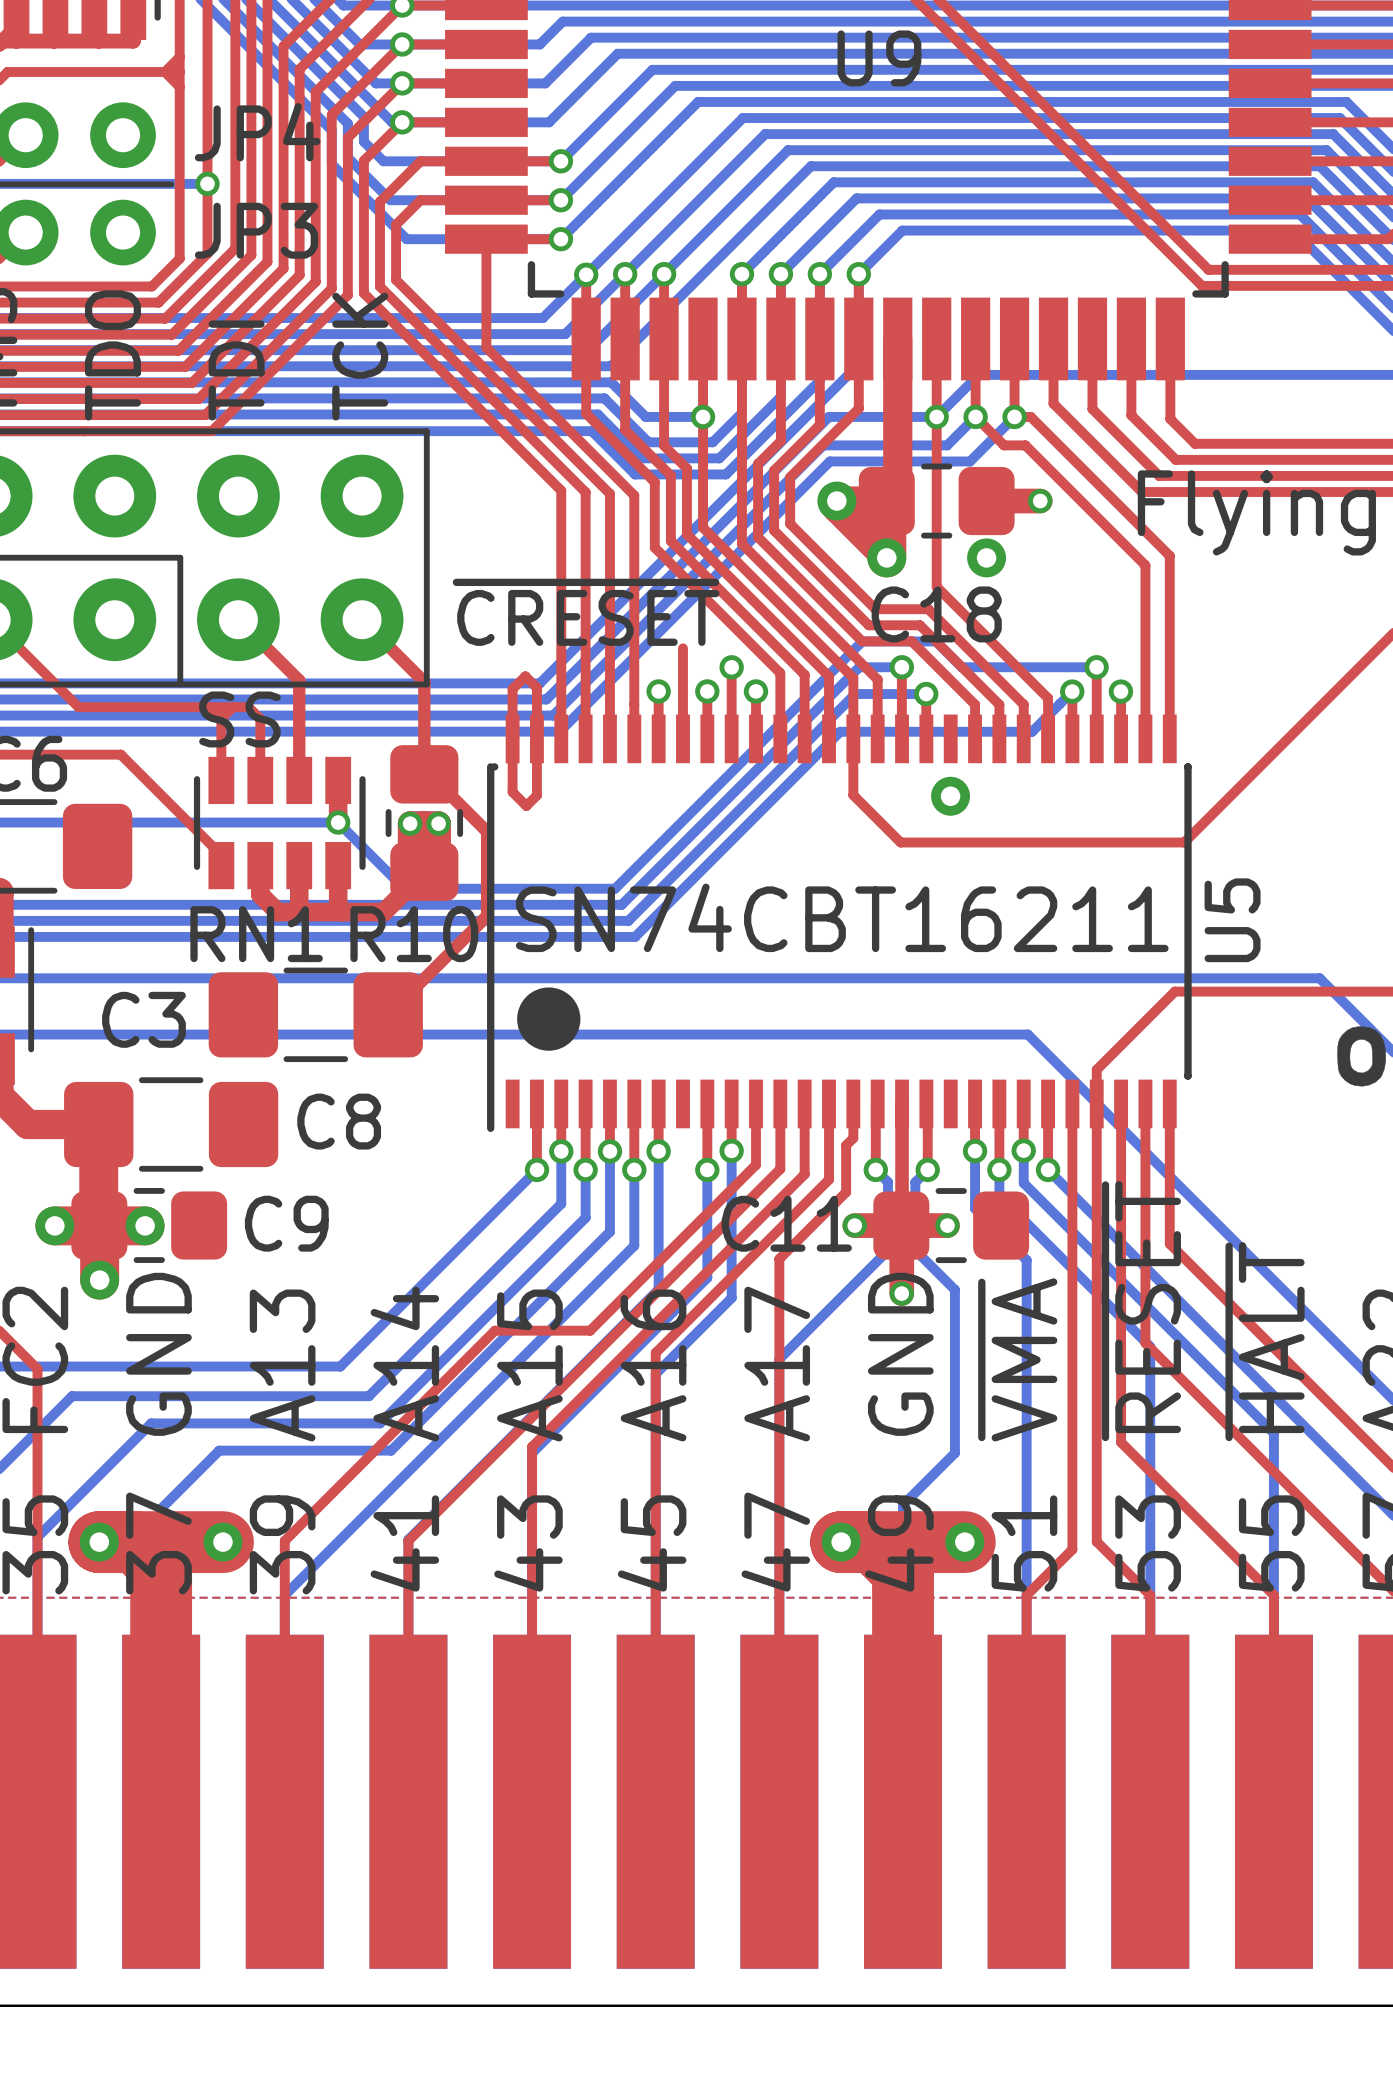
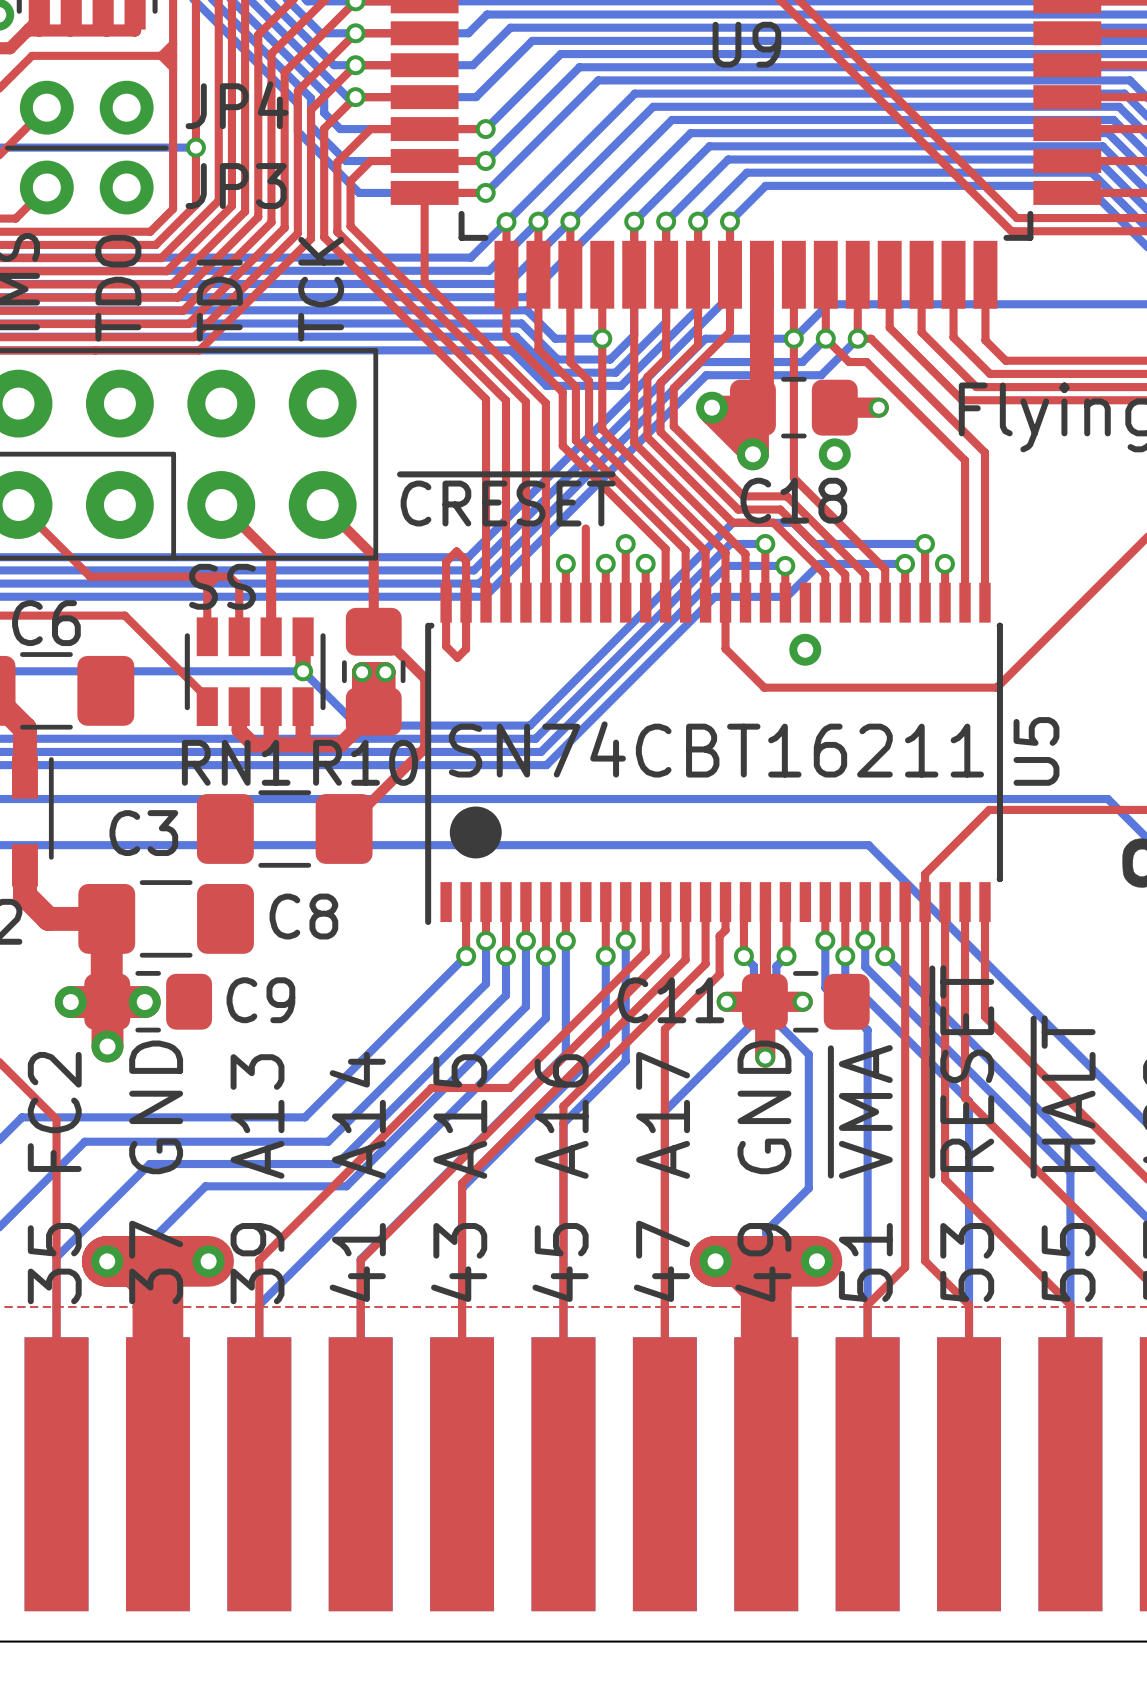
bottom track: (1072, 691) (1032, 731) (927, 731) -> (905, 563) (819, 563) (786, 596)

